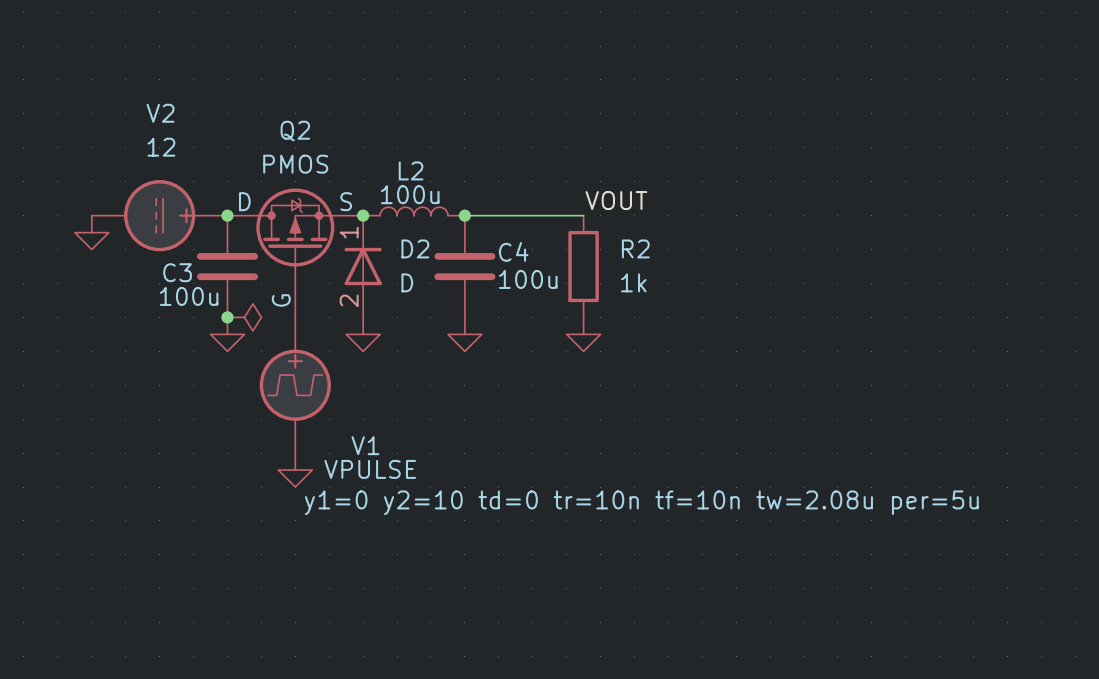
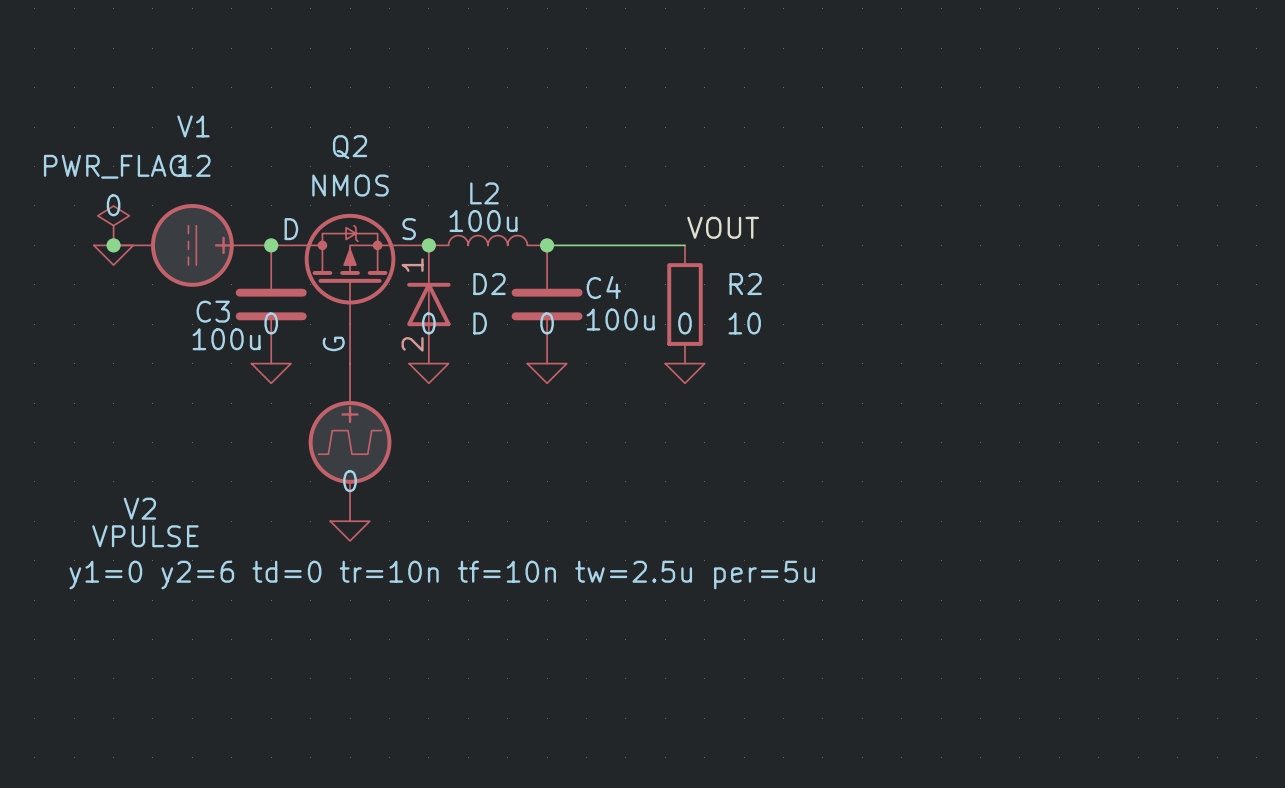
V2 name: V2 (160, 113) -> V1 (193, 126)
Q2 value: PMOS (295, 164) -> NMOS (350, 185)
power symbol text: none -> 0 (113, 205)
power symbol: none -> PWR_FLAG (113, 225)
power symbol shape: [74, 215, 109, 250] -> [93, 245, 134, 266]
junction: none -> (113, 245)
power symbol text: none -> 0 (271, 323)
power symbol text: none -> 0 (428, 323)
power symbol text: none -> 0 (547, 323)
power symbol text: none -> 0 (684, 323)
R2 value: 1k (633, 282) -> 10 (744, 323)
power symbol shape: [210, 317, 245, 352] -> [251, 363, 291, 384]
junction: (227, 317) -> none
power symbol: (244, 317) -> none
power symbol shape: [346, 317, 381, 352] -> [409, 363, 449, 384]
power symbol shape: [447, 317, 482, 352] -> [527, 363, 567, 384]
power symbol shape: [566, 317, 601, 352] -> [665, 363, 705, 384]
power symbol text: none -> 0 (350, 481)
V1 name: V1 (365, 445) -> V2 (139, 508)
power symbol shape: [278, 453, 313, 488] -> [330, 521, 370, 541]
V1 value position: VPULSE (370, 469) -> VPULSE (145, 536)
V1 text: y1=0 y2=10 td=0 tr=10n tf=10n tw=2.08u per=5u (641, 502) -> y1=0 y2=6 td=0 tr=10n tf=10n tw=2.5u per=5u (442, 575)

